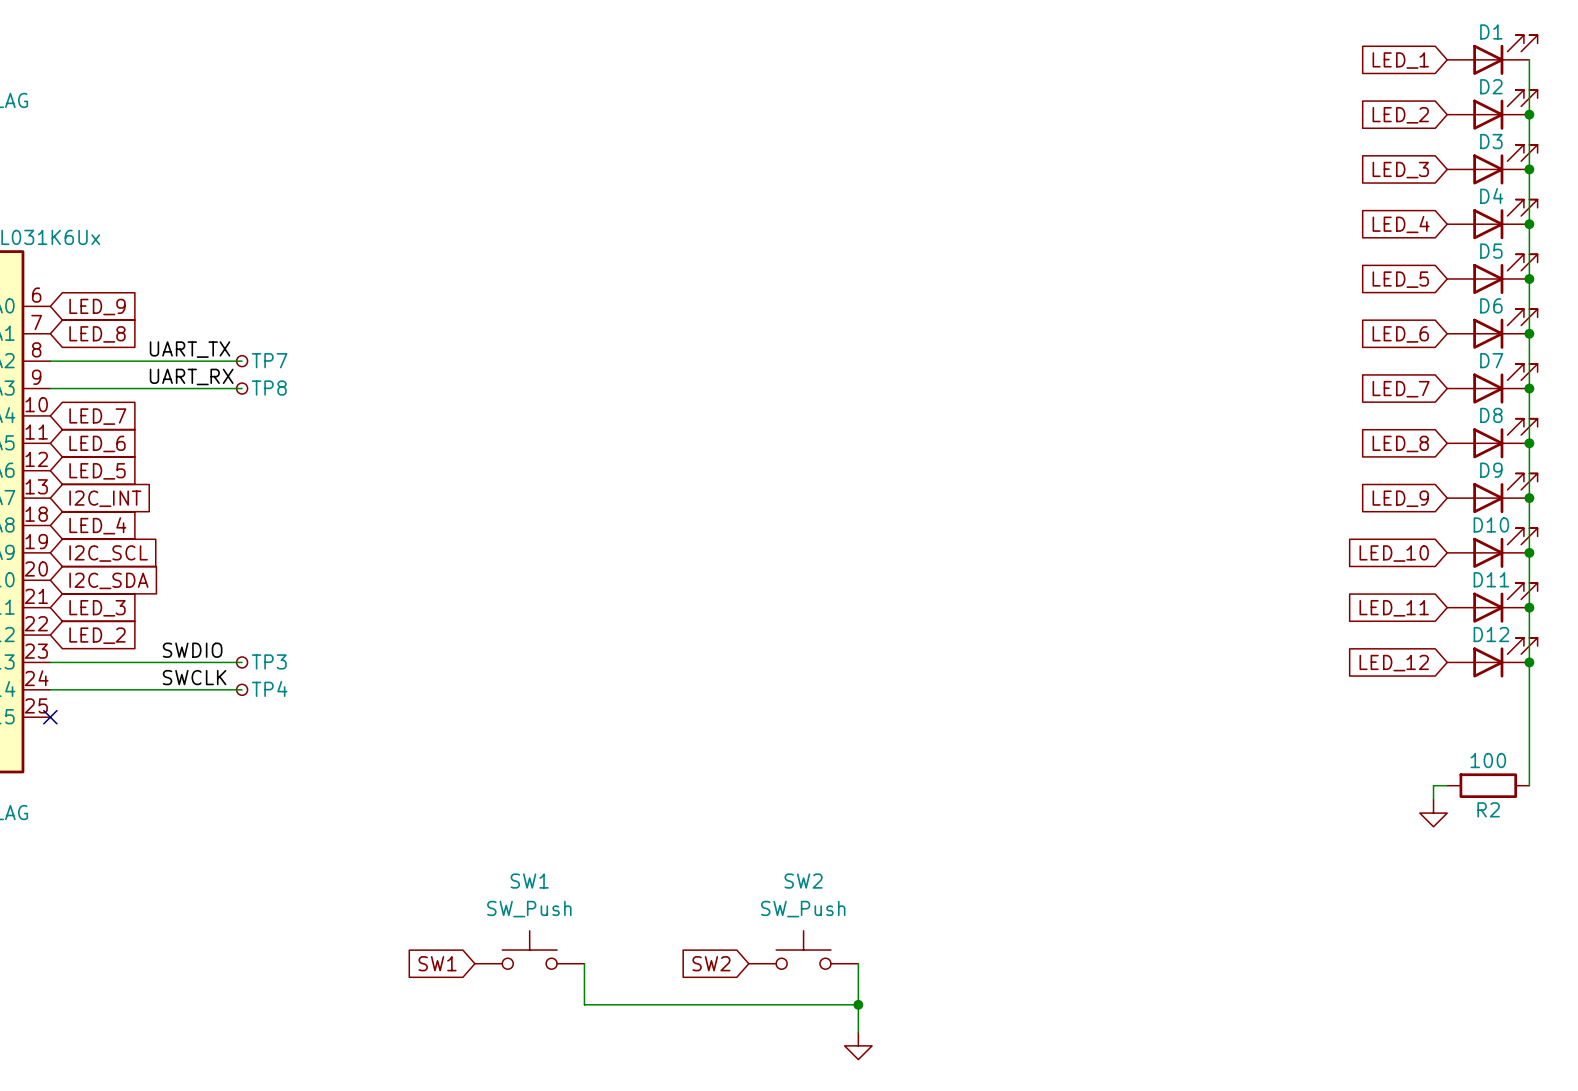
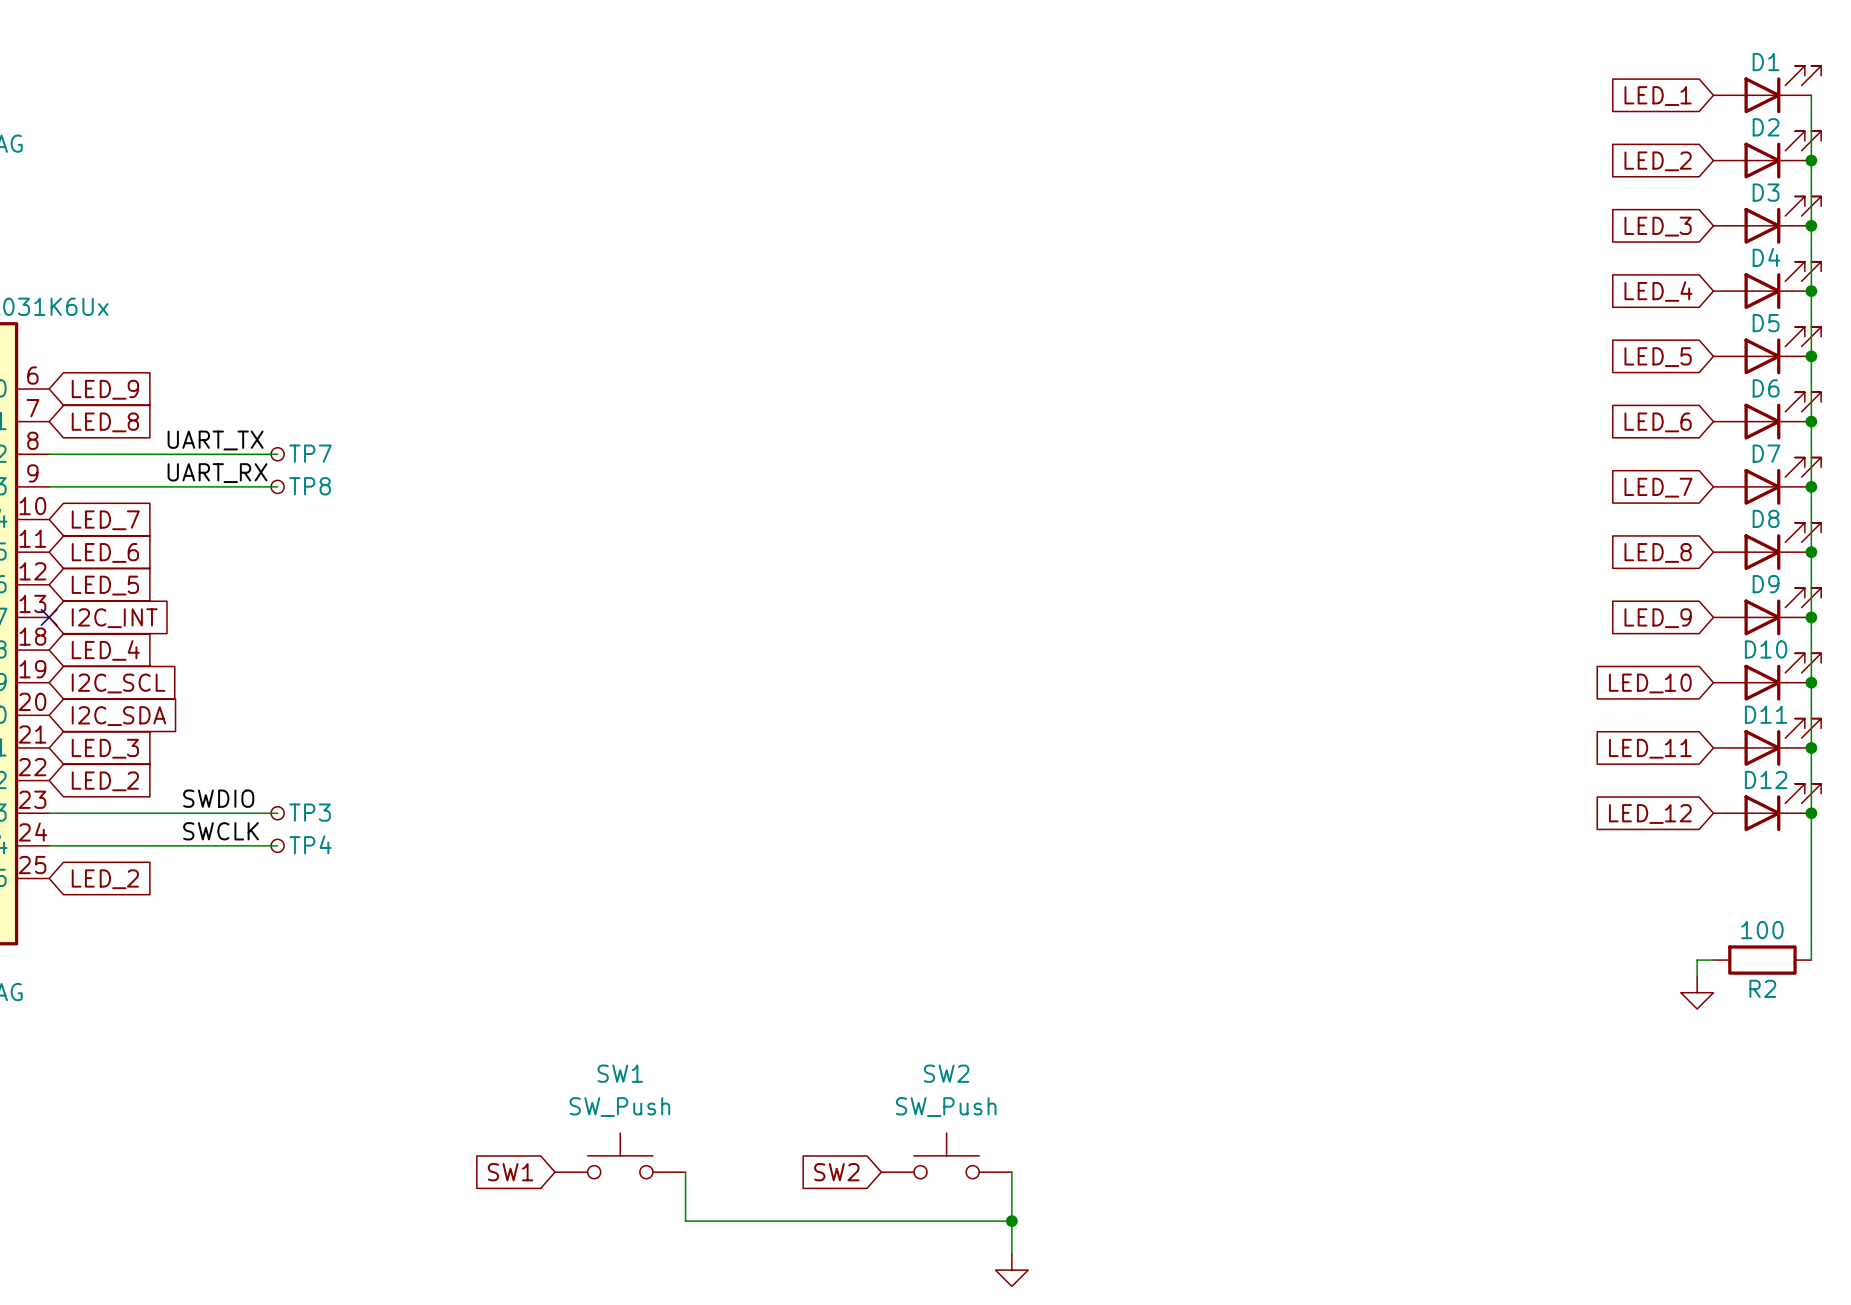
no-connect mark: none -> (49, 617)
no-connect mark: (50, 717) -> none
global label: none -> LED_2 (105, 879)

